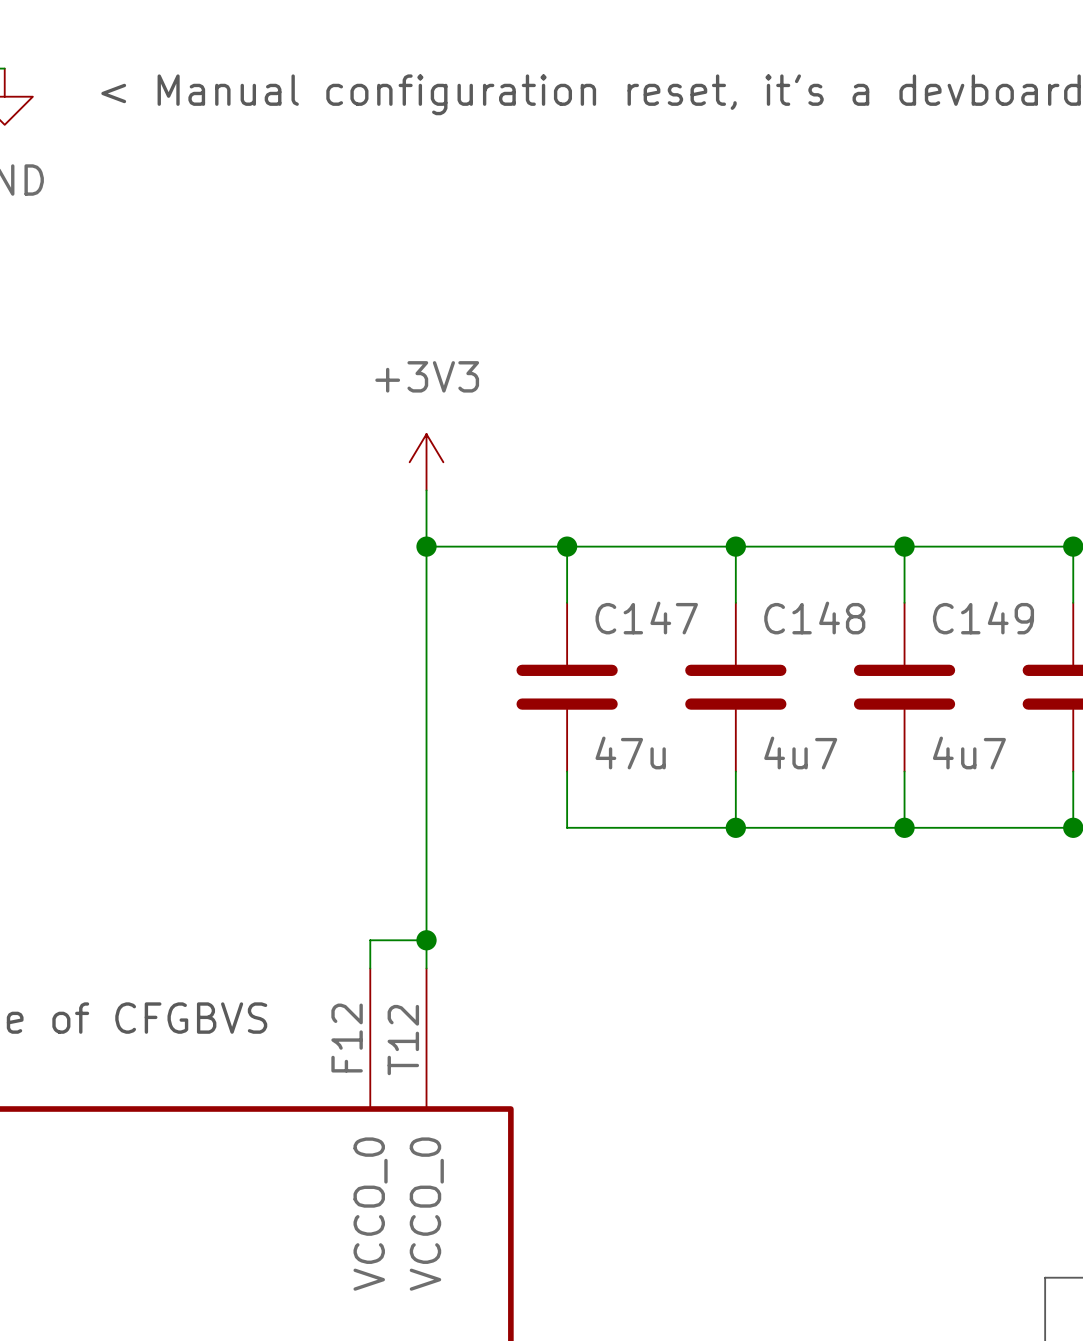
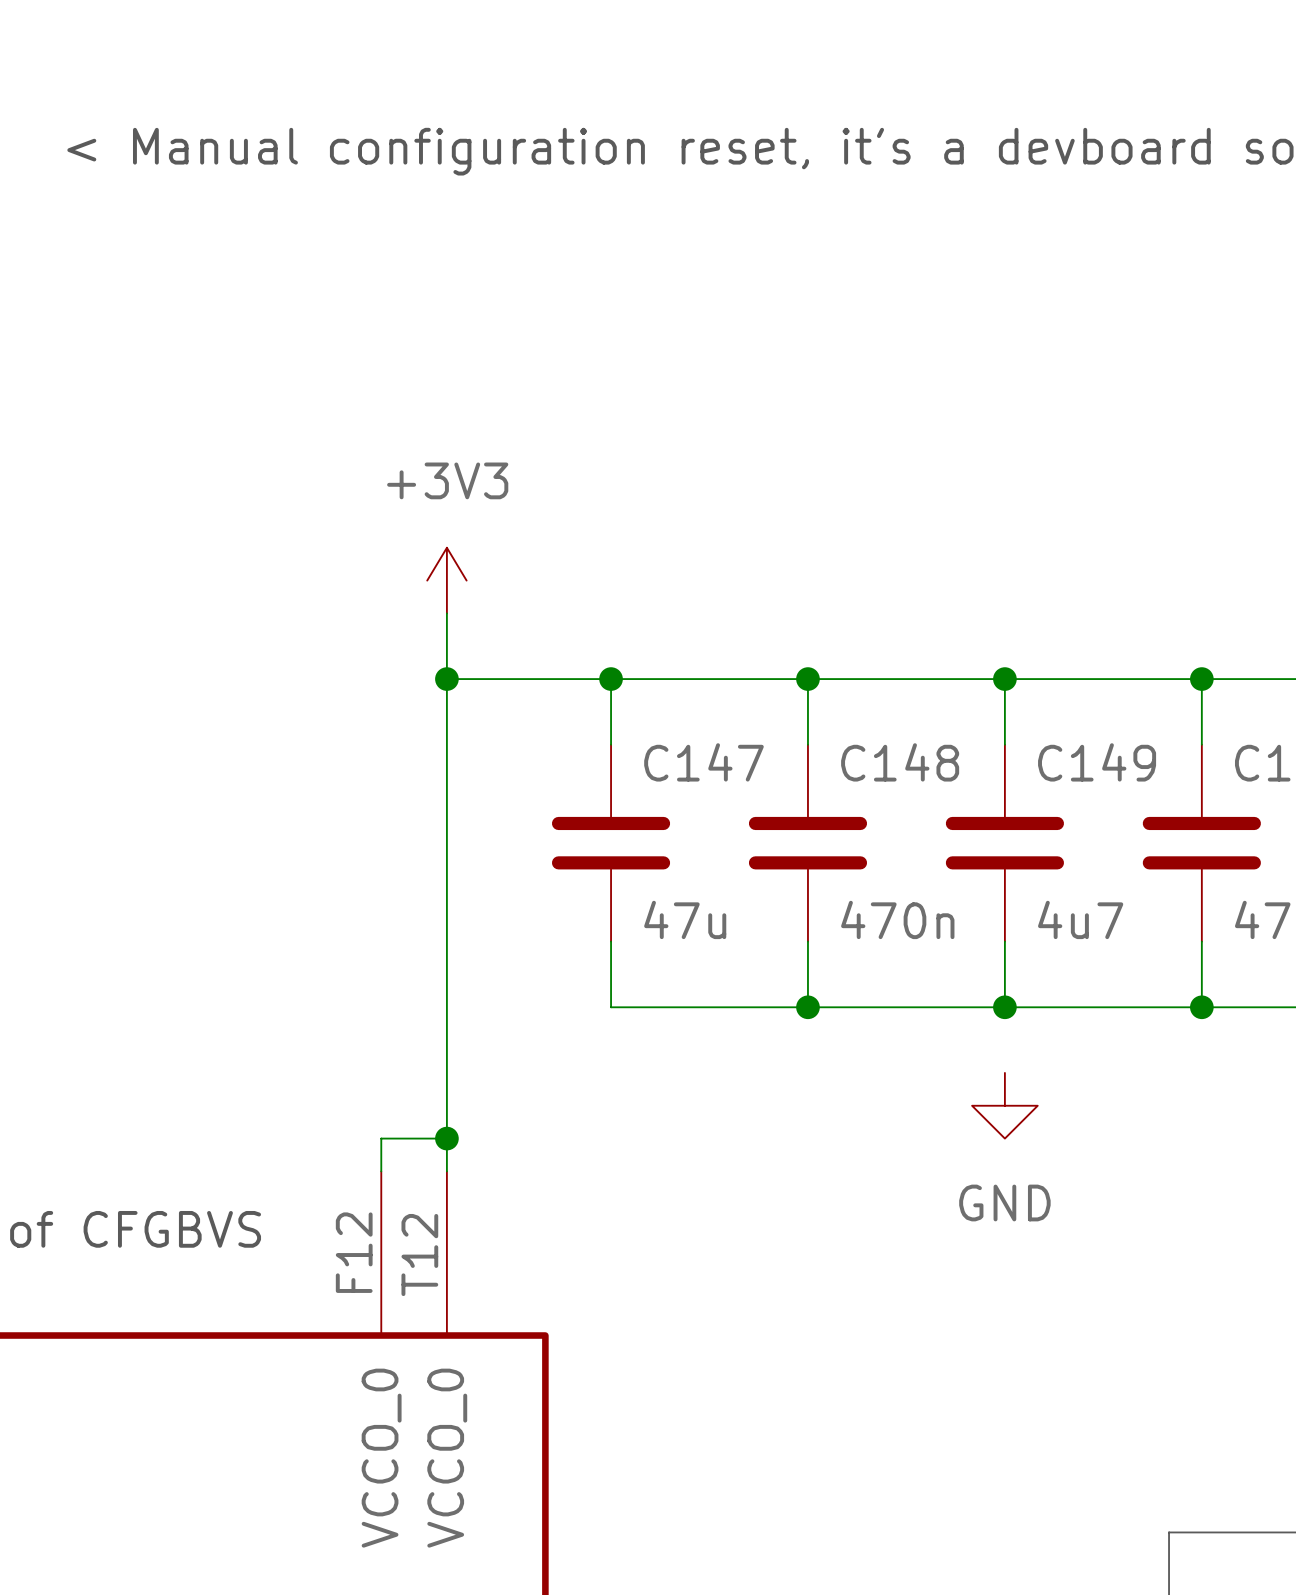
C148 value: 4u7 (800, 752) -> 470n (897, 919)
power symbol: none -> GND (1004, 1105)

